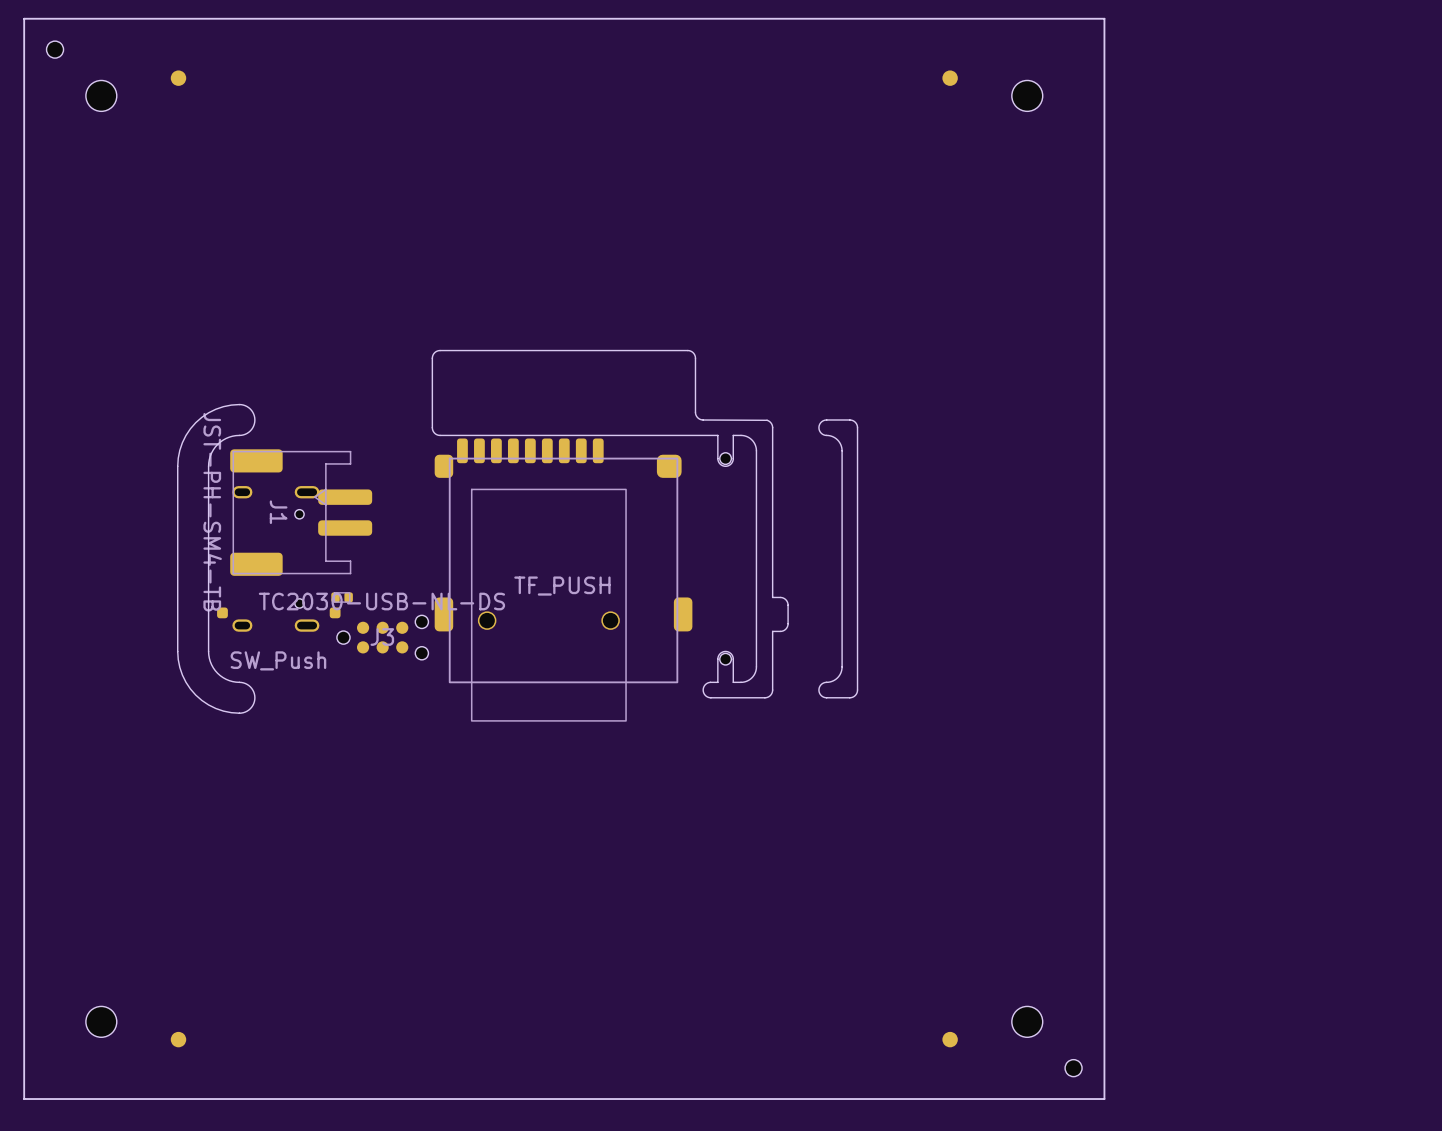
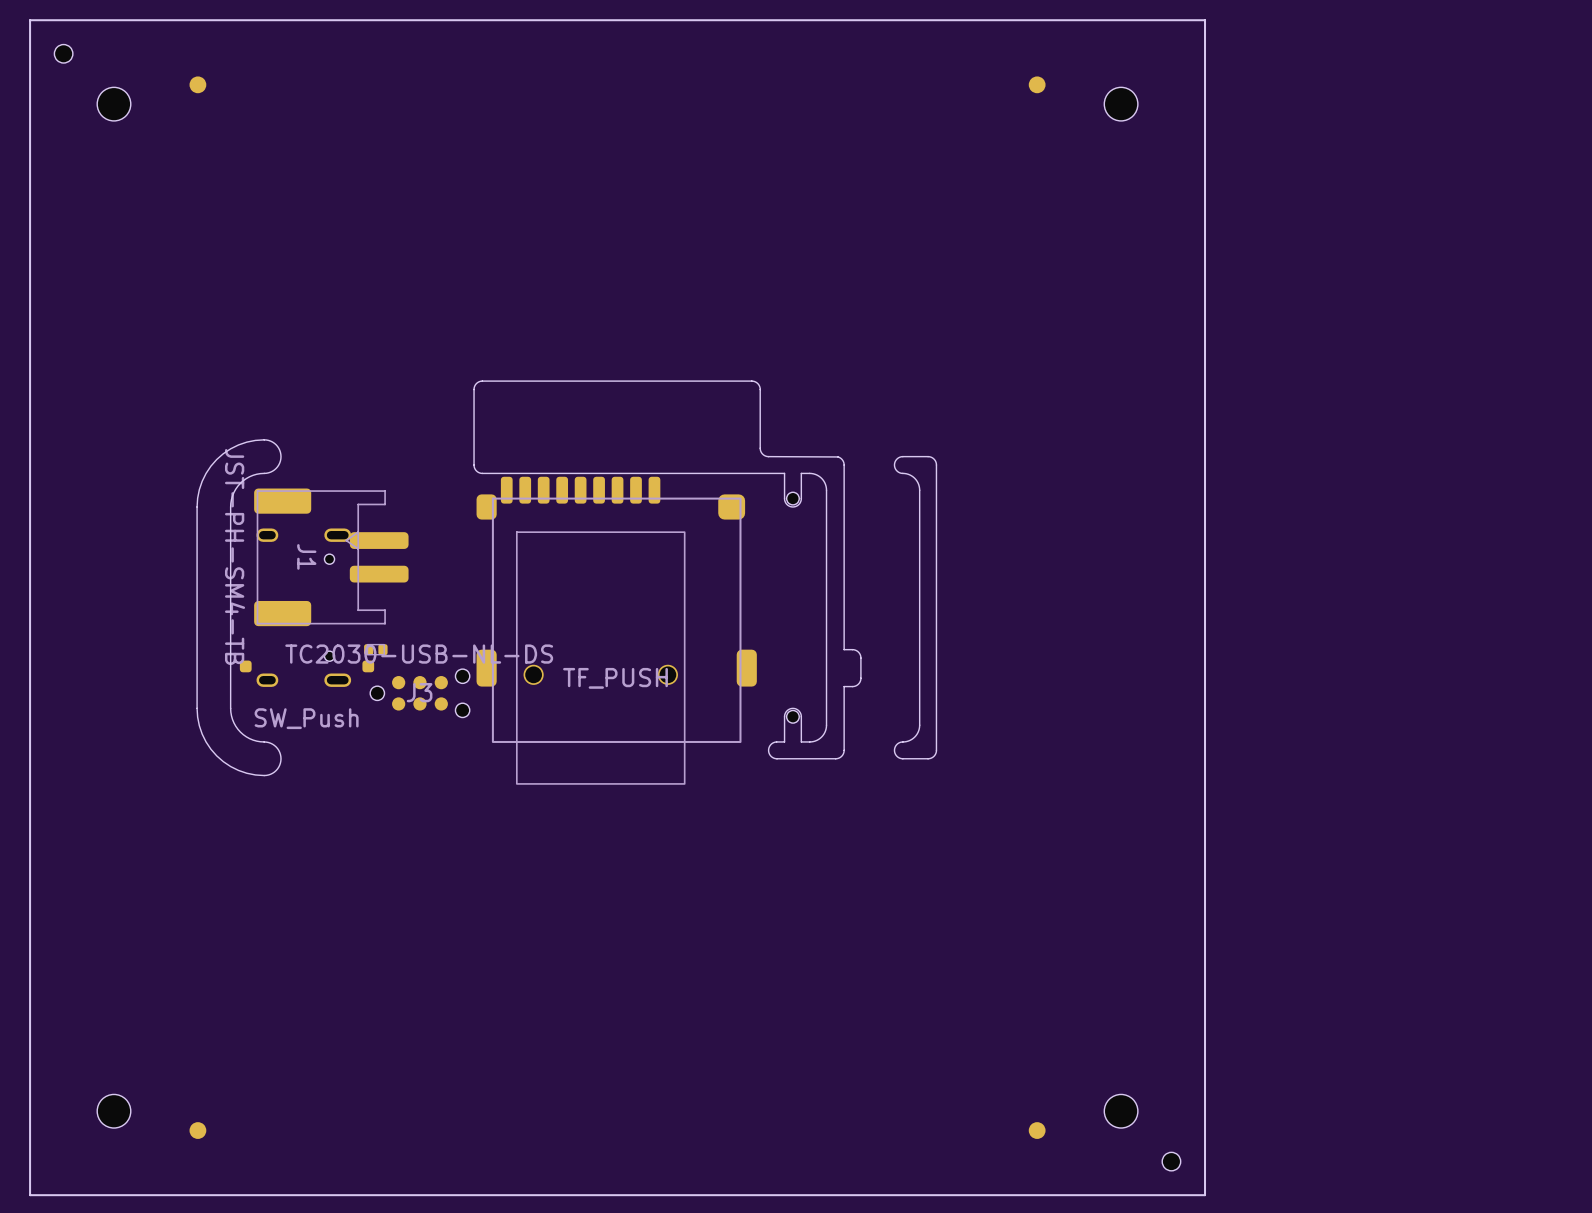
part value position: TF_PUSH (562, 586) -> TF_PUSH (615, 678)

